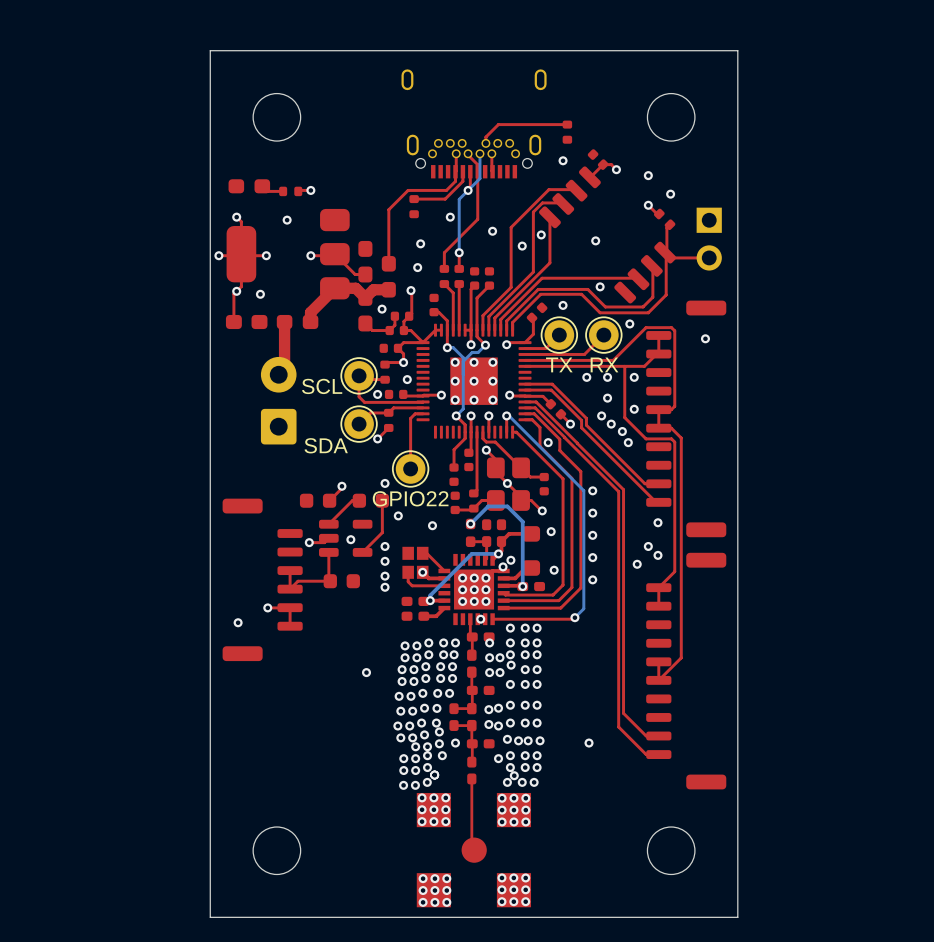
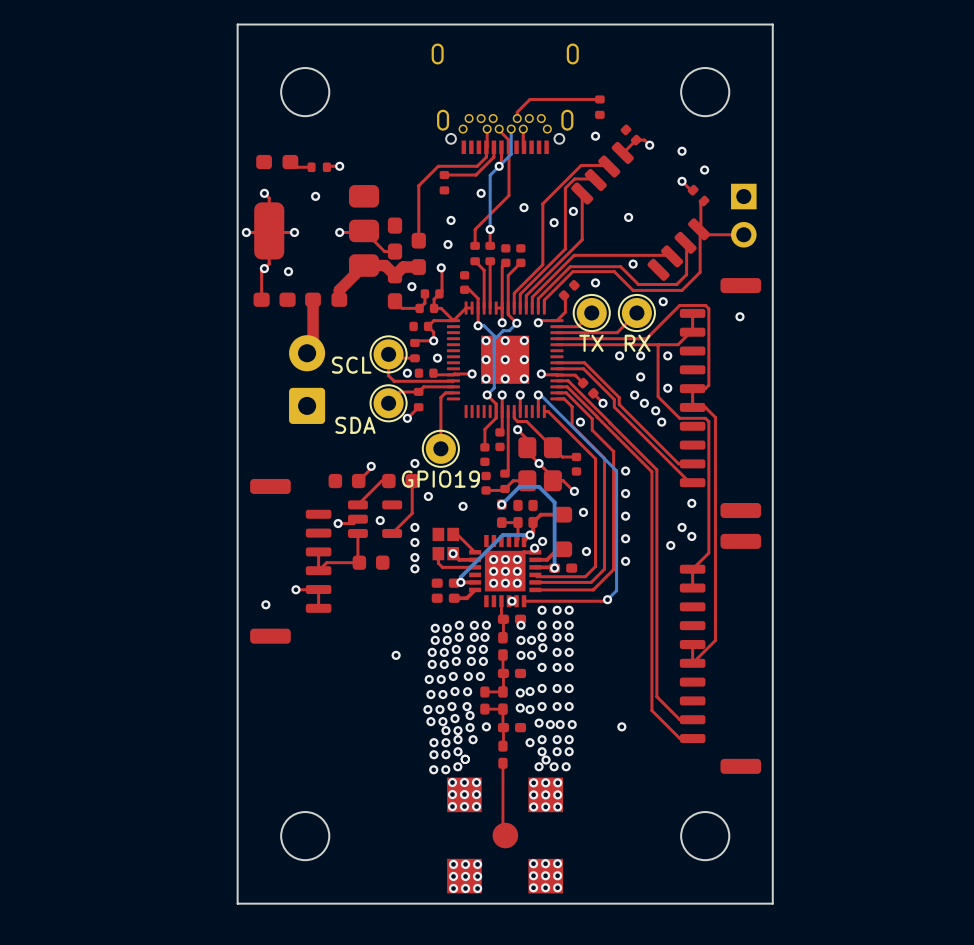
part value: GPIO22 (410, 498) -> GPIO19 (440, 479)

